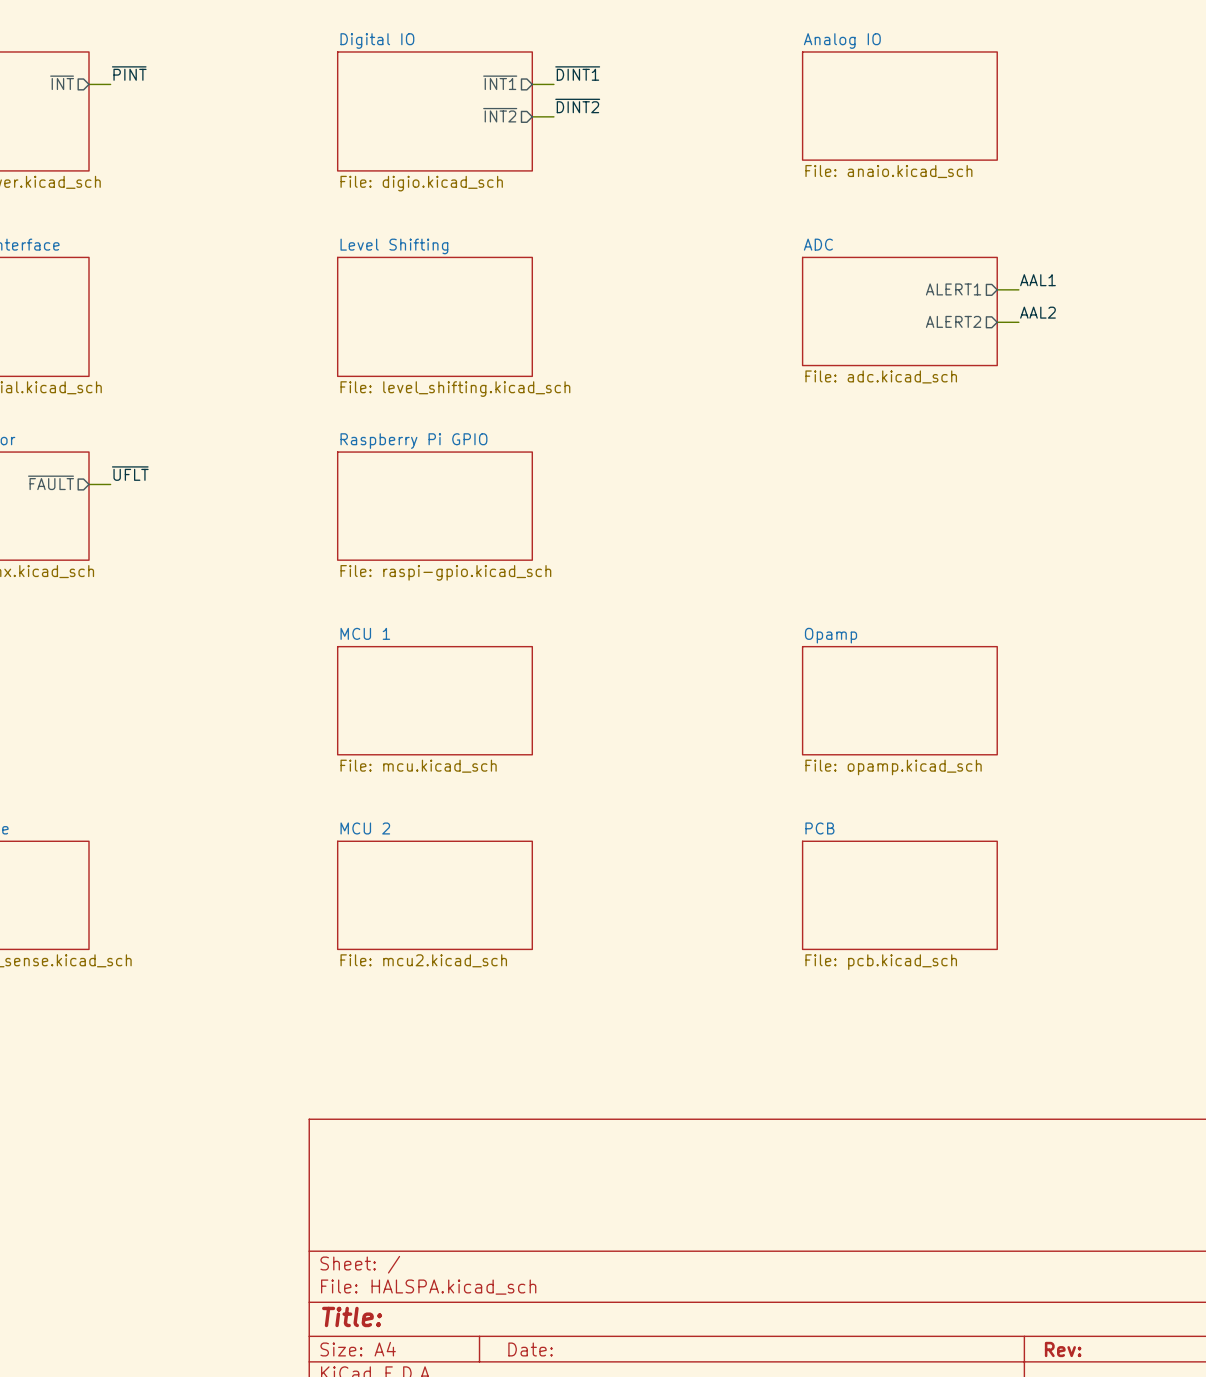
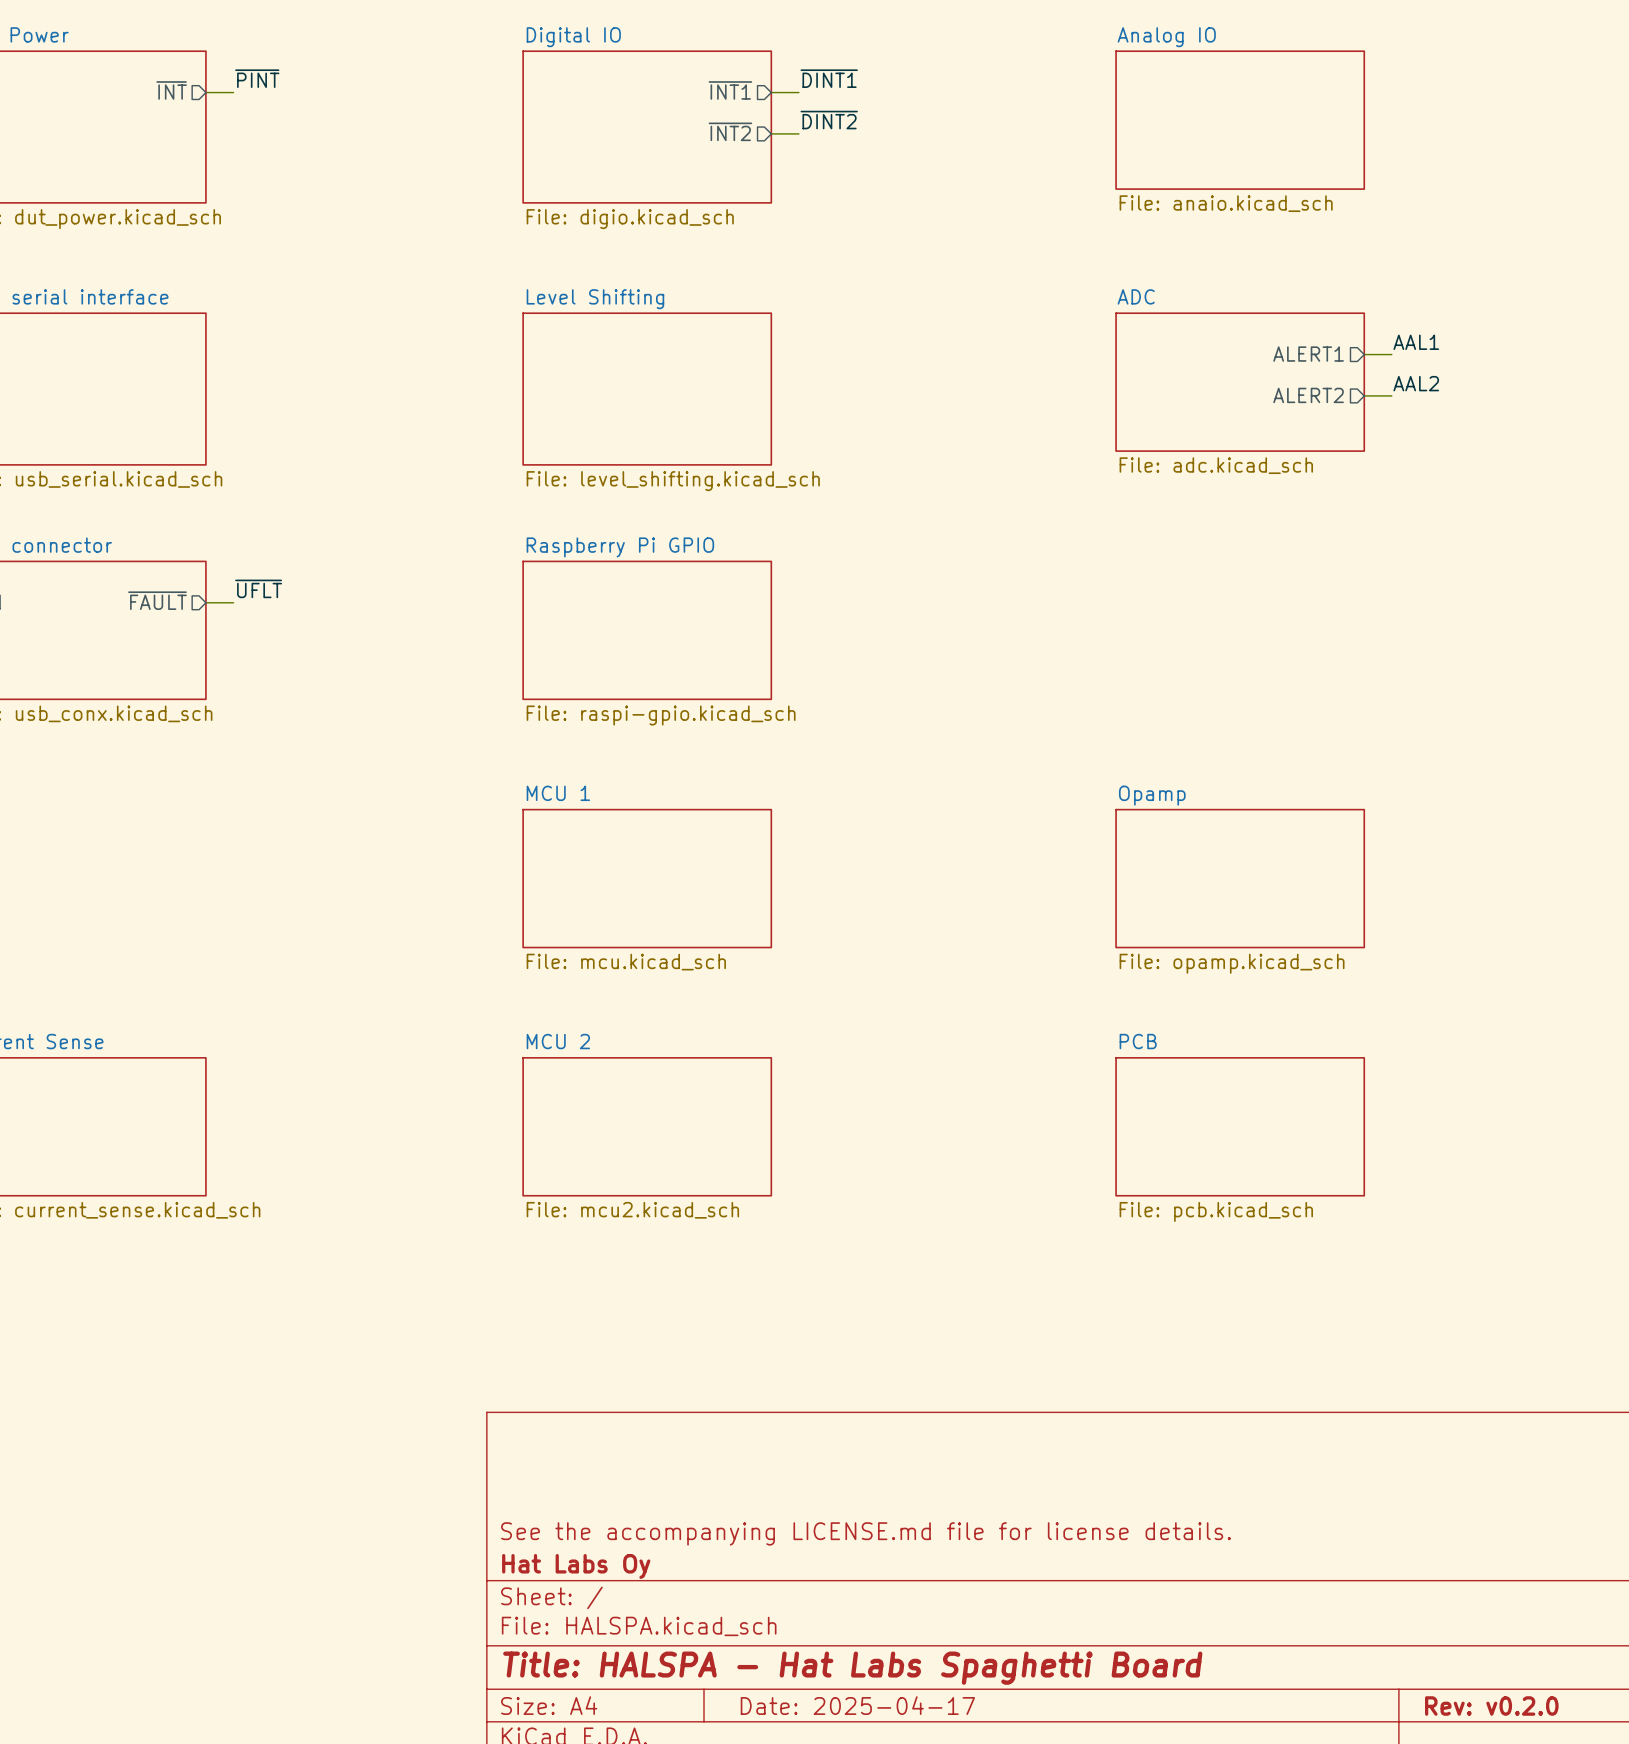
title block: none -> See the accompanying LICENSE.md file for license details. (866, 1533)
title block: none -> Hat Labs Oy (576, 1566)
title block: Title: (352, 1316) -> Title: HALSPA - Hat Labs Spaghetti Board (852, 1668)
title block: Date: (530, 1349) -> Date: 2025-04-17 (857, 1705)
title block: Rev: (1063, 1349) -> Rev: v0.2.0 (1491, 1706)

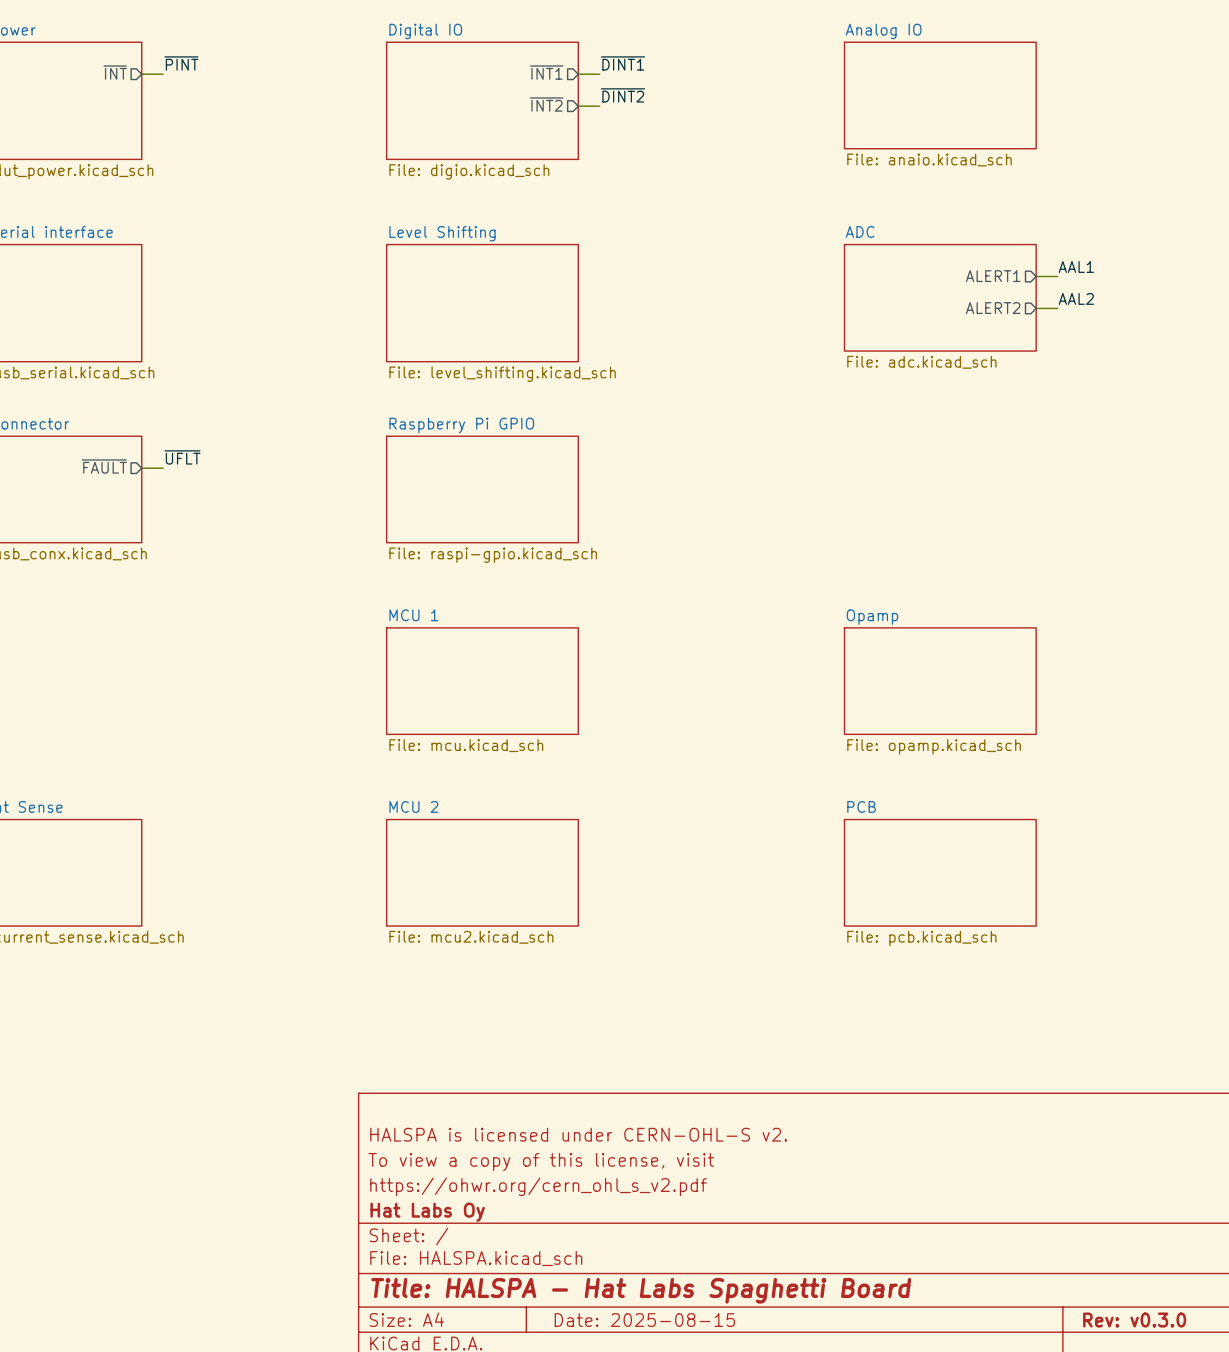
title block: none -> HALSPA is licensed under CERN-OHL-S v2. (578, 1134)
title block: none -> To view a copy of this license, visit (541, 1161)
title block: See the accompanying LICENSE.md file for license details. (866, 1533) -> https://ohwr.org/cern_ohl_s_v2.pdf (538, 1186)
title block: Date: 2025-04-17 (857, 1705) -> Date: 2025-08-15 (644, 1320)
title block: Rev: v0.2.0 (1491, 1706) -> Rev: v0.3.0 (1134, 1320)

